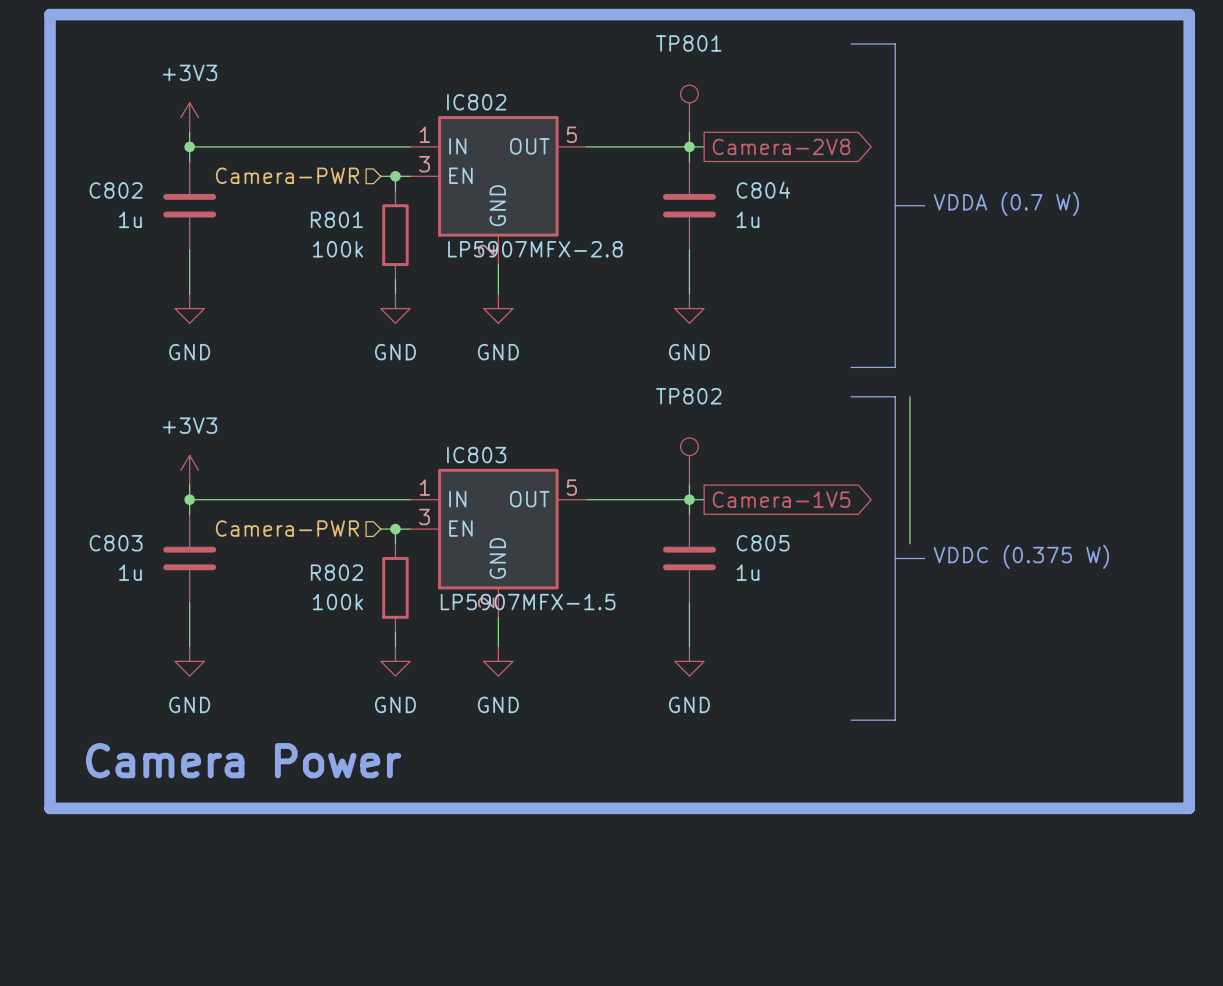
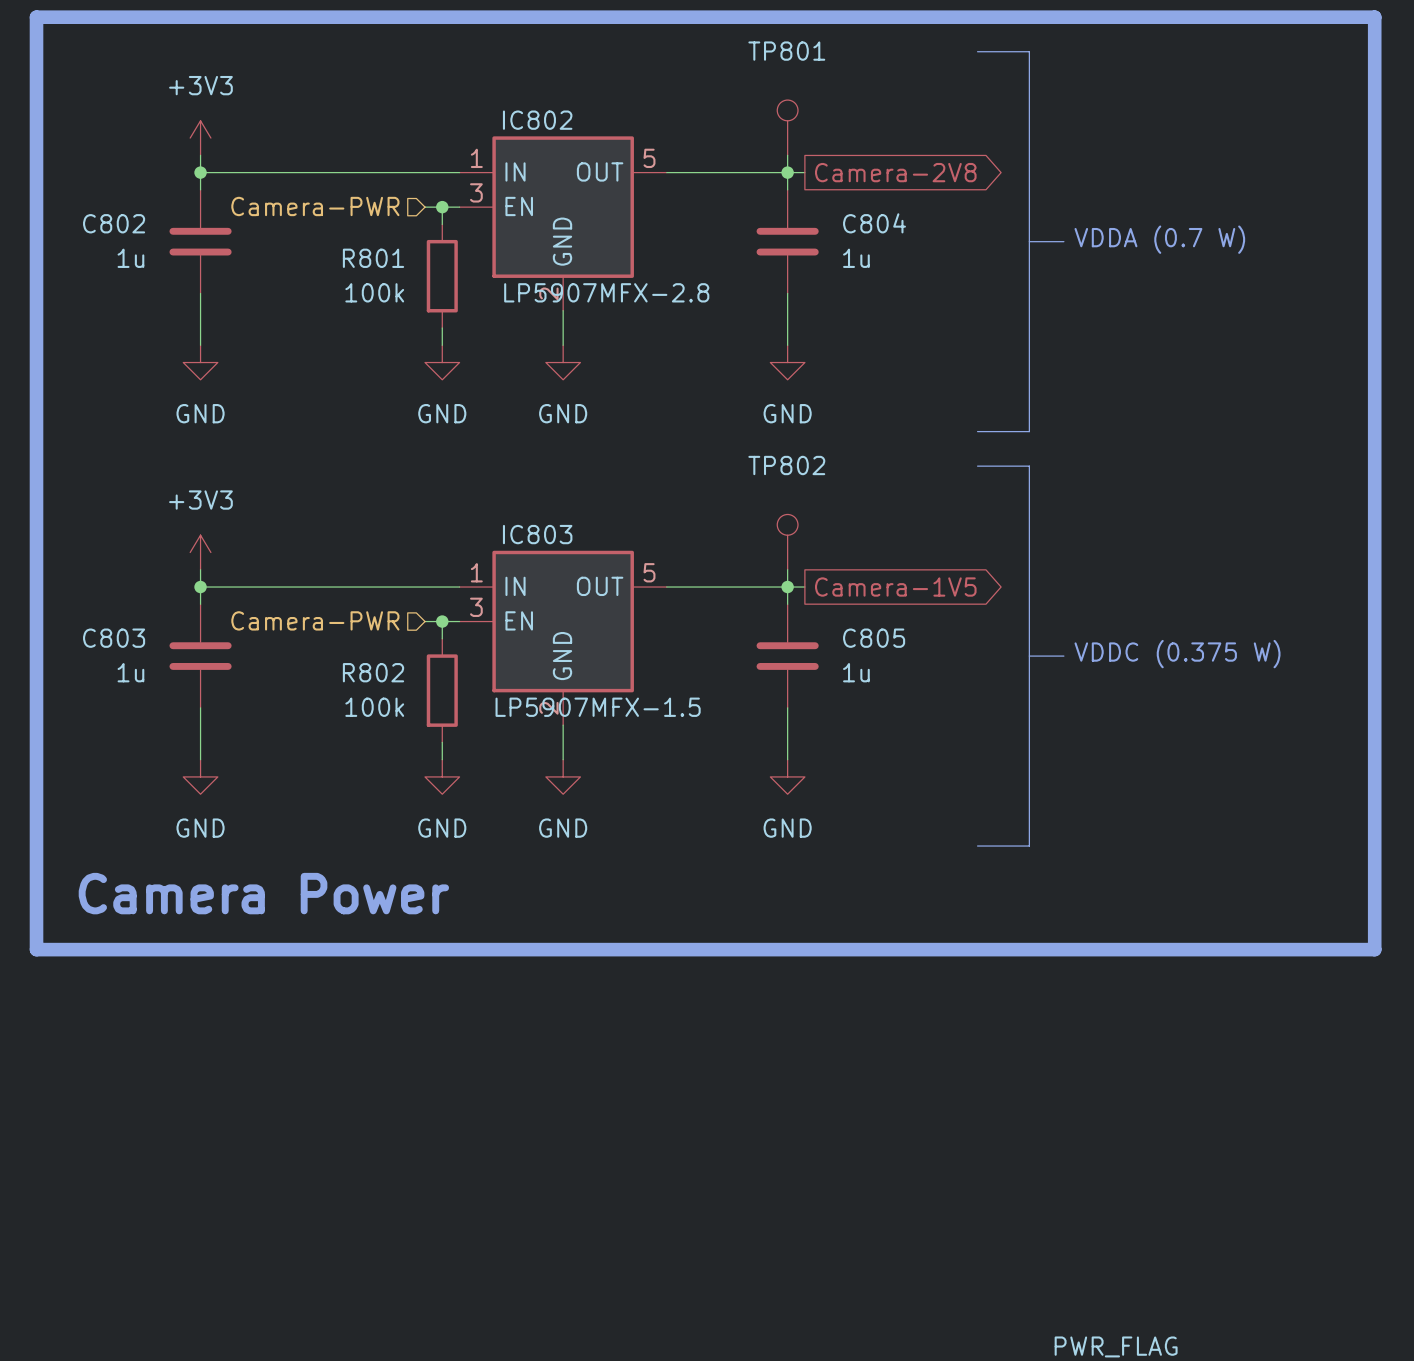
wire: (909, 396) (909, 543) -> none

